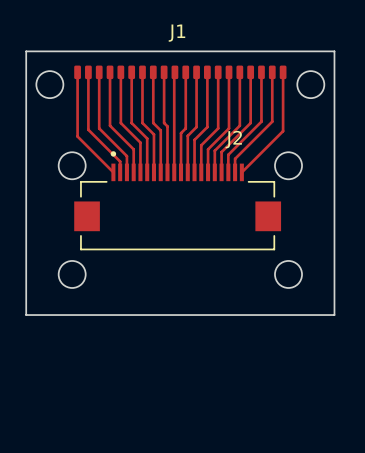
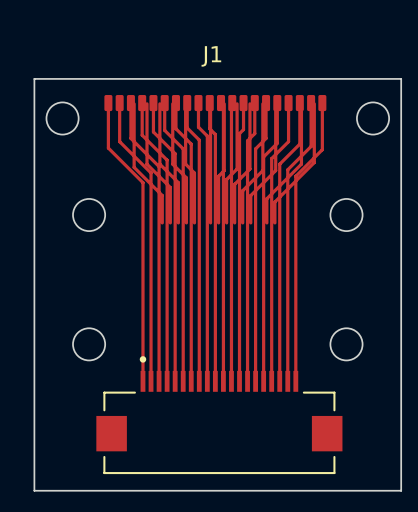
J1 footprint: [74, 65, 287, 80] -> [104, 95, 327, 112]
top track: none -> (119, 103) (119, 141) (151, 173) (151, 378)
top track: none -> (130, 103) (130, 138) (159, 166) (159, 378)
top track: none -> (142, 103) (142, 135) (167, 160) (167, 378)
top track: none -> (153, 103) (153, 132) (175, 153) (175, 378)
top track: none -> (164, 103) (164, 130) (183, 148) (183, 378)
top track: none -> (175, 103) (175, 128) (191, 144) (191, 378)
top track: none -> (187, 103) (187, 127) (199, 140) (199, 378)
top track: none -> (209, 103) (209, 128) (215, 134) (215, 378)
top track: none -> (221, 103) (223, 105) (223, 378)
top track: none -> (232, 103) (231, 378)
top track: none -> (243, 103) (243, 129) (239, 133) (239, 378)
top track: none -> (254, 103) (254, 133) (247, 140) (247, 378)
top track: none -> (266, 103) (266, 138) (255, 148) (255, 378)
top track: none -> (277, 103) (277, 143) (263, 156) (263, 378)
top track: none -> (299, 103) (299, 144) (279, 164) (279, 378)
top track: none -> (311, 103) (311, 146) (287, 169) (287, 378)
top track: none -> (322, 103) (322, 149) (295, 176) (295, 378)
top track: (77, 72) (77, 136) (113, 172) -> none
top track: (99, 72) (99, 128) (126, 156) (126, 172) -> none
top track: (272, 72) (272, 121) (235, 158) (235, 172) -> none
top track: (283, 72) (283, 131) (241, 172) -> none
top track: (164, 91) (164, 123) (167, 126) (167, 172) -> (198, 127) (207, 136) (207, 378)
top track: (239, 104) (239, 125) (214, 150) (214, 172) -> (288, 141) (271, 158) (271, 378)
top track: (88, 109) (88, 129) (120, 161) (120, 172) -> (108, 148) (142, 182) (142, 378)
J2: (177, 200) -> none
board edge: (26, 315) (334, 315) -> (34, 392) (34, 490) (401, 490) (401, 392)
part: none -> (219, 415)

